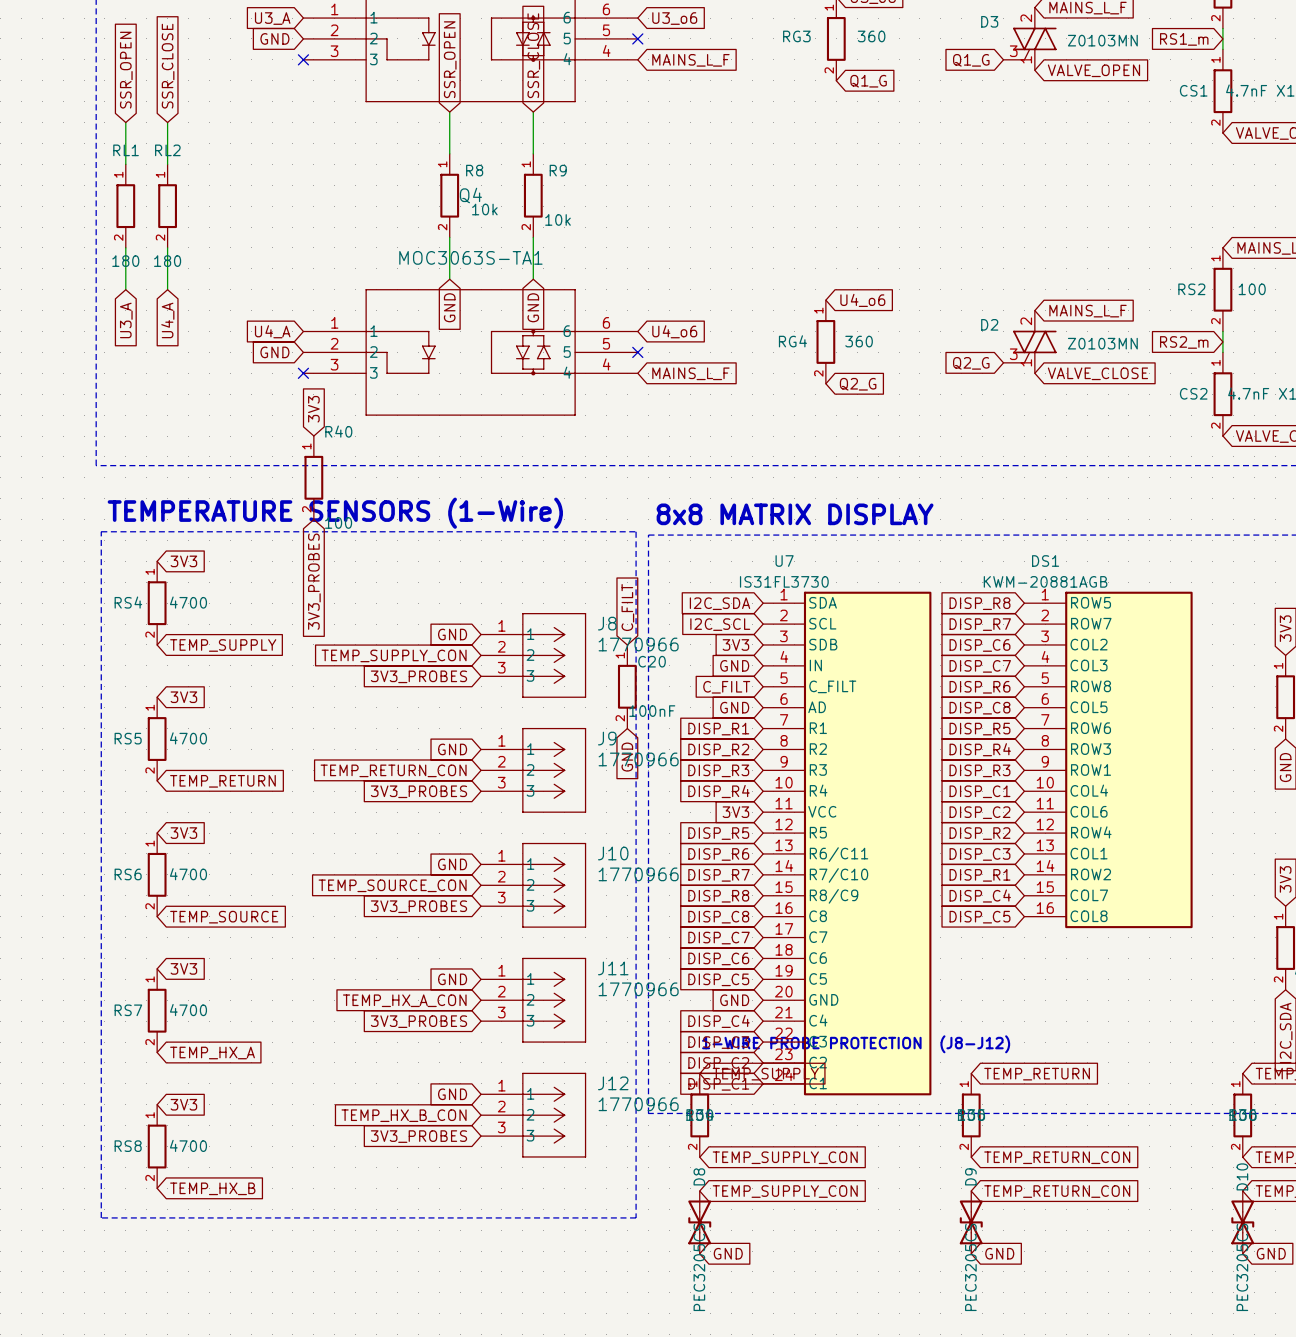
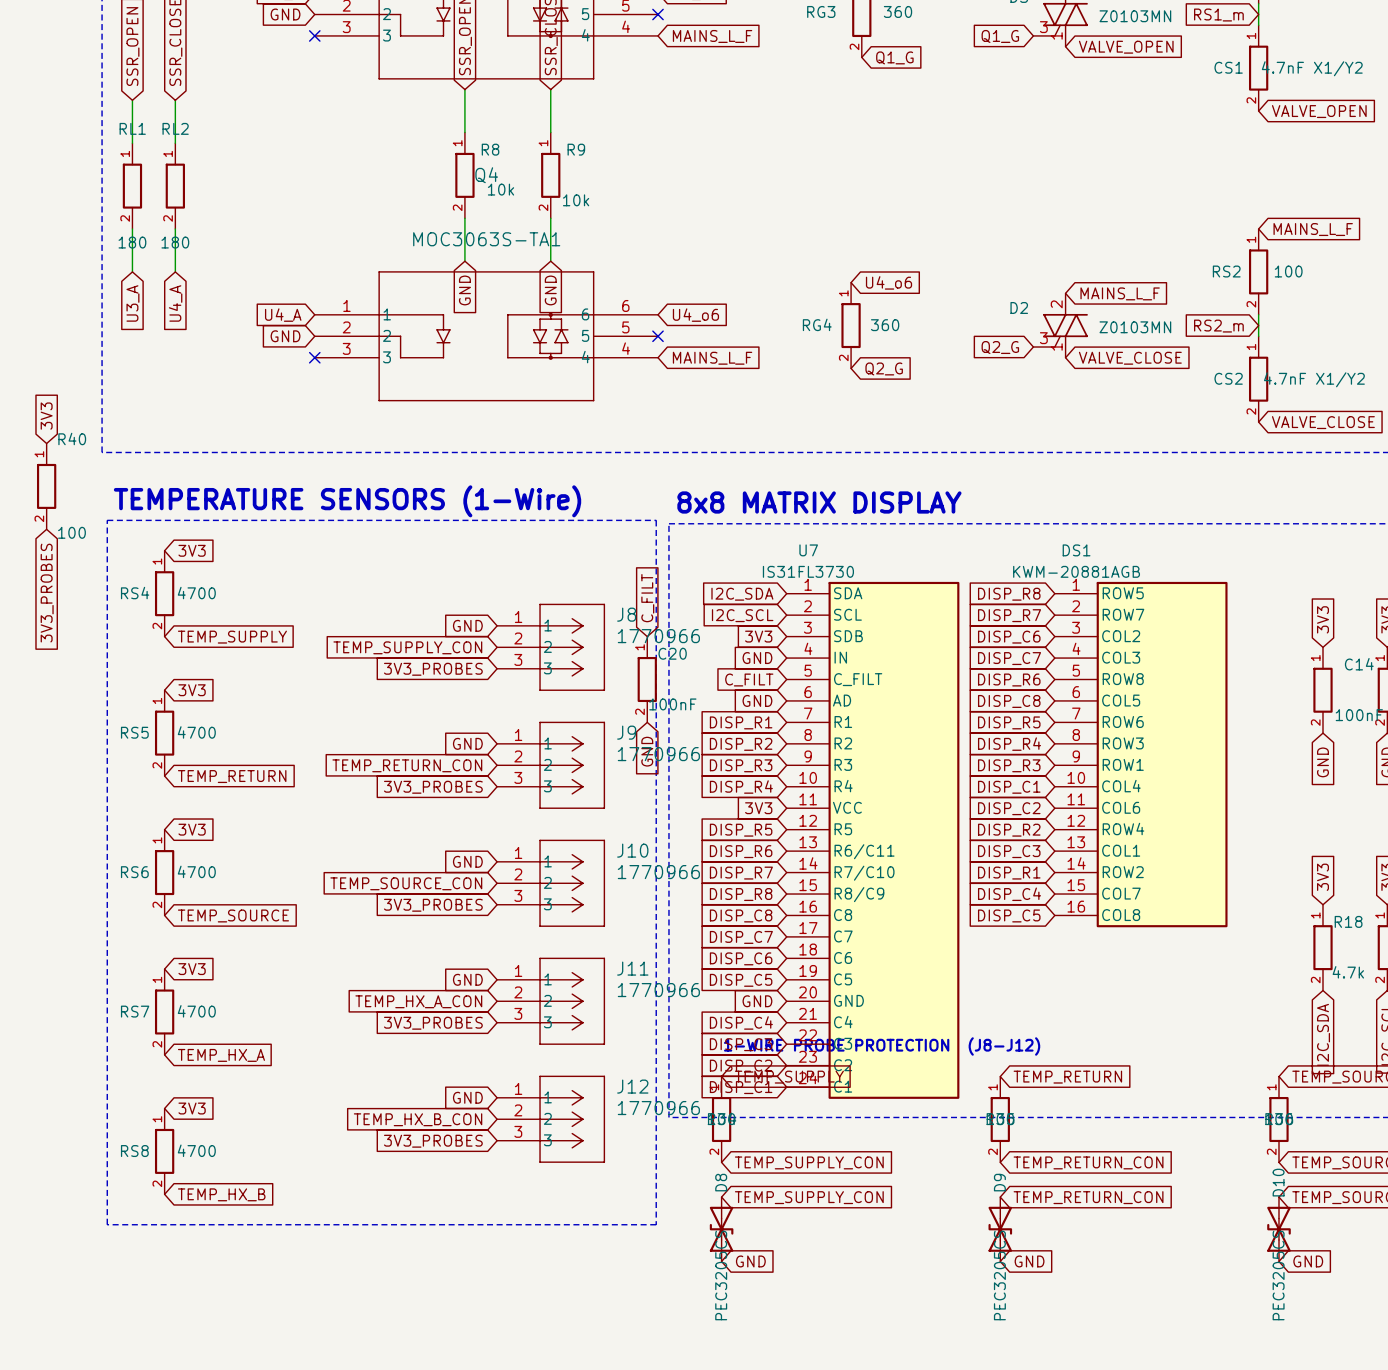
global label: 3V3 (313, 409) -> none
global label: none -> 3V3 (46, 416)
R40 position: (313, 477) -> (46, 486)
global label: 3V3_PROBES (314, 581) -> none
global label: none -> 3V3_PROBES (47, 593)

